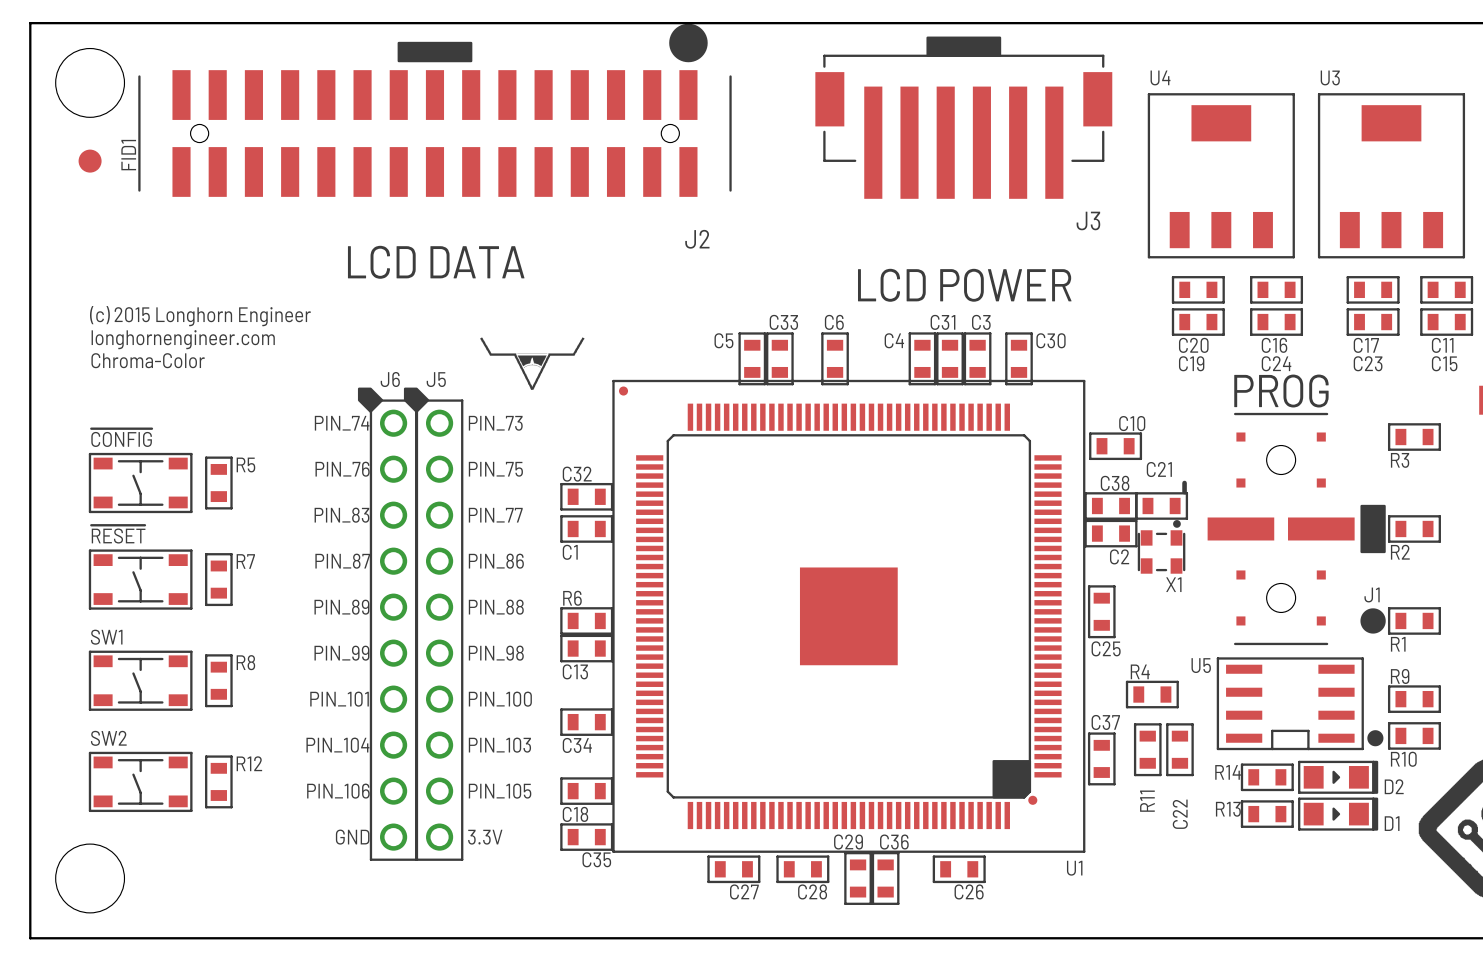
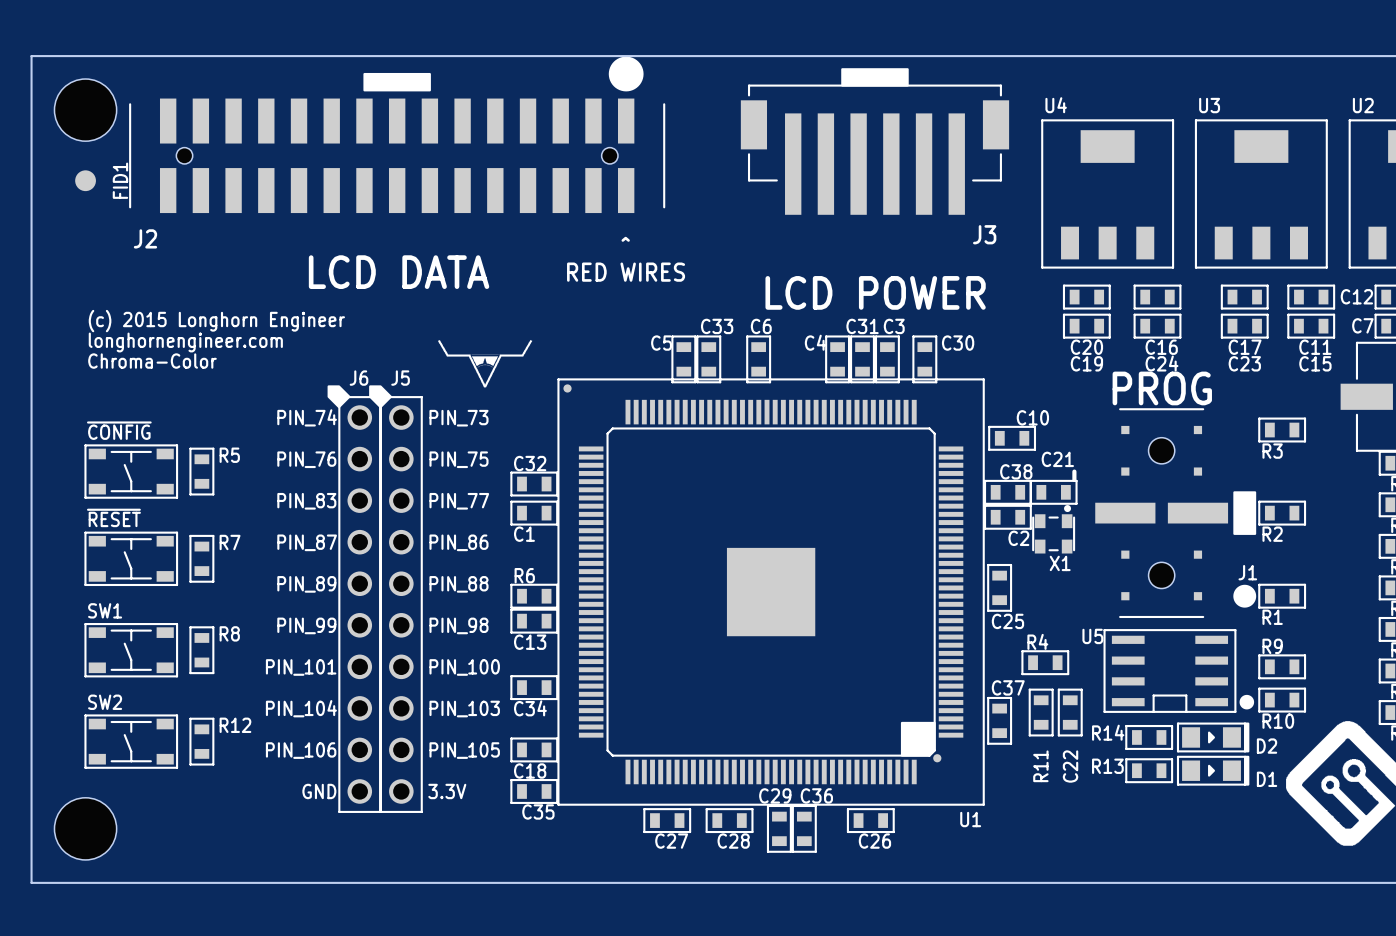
text: none -> ^ (625, 239)
J2 name position: J2 (697, 239) -> J2 (145, 238)
text: none -> RED WIRES (626, 272)

